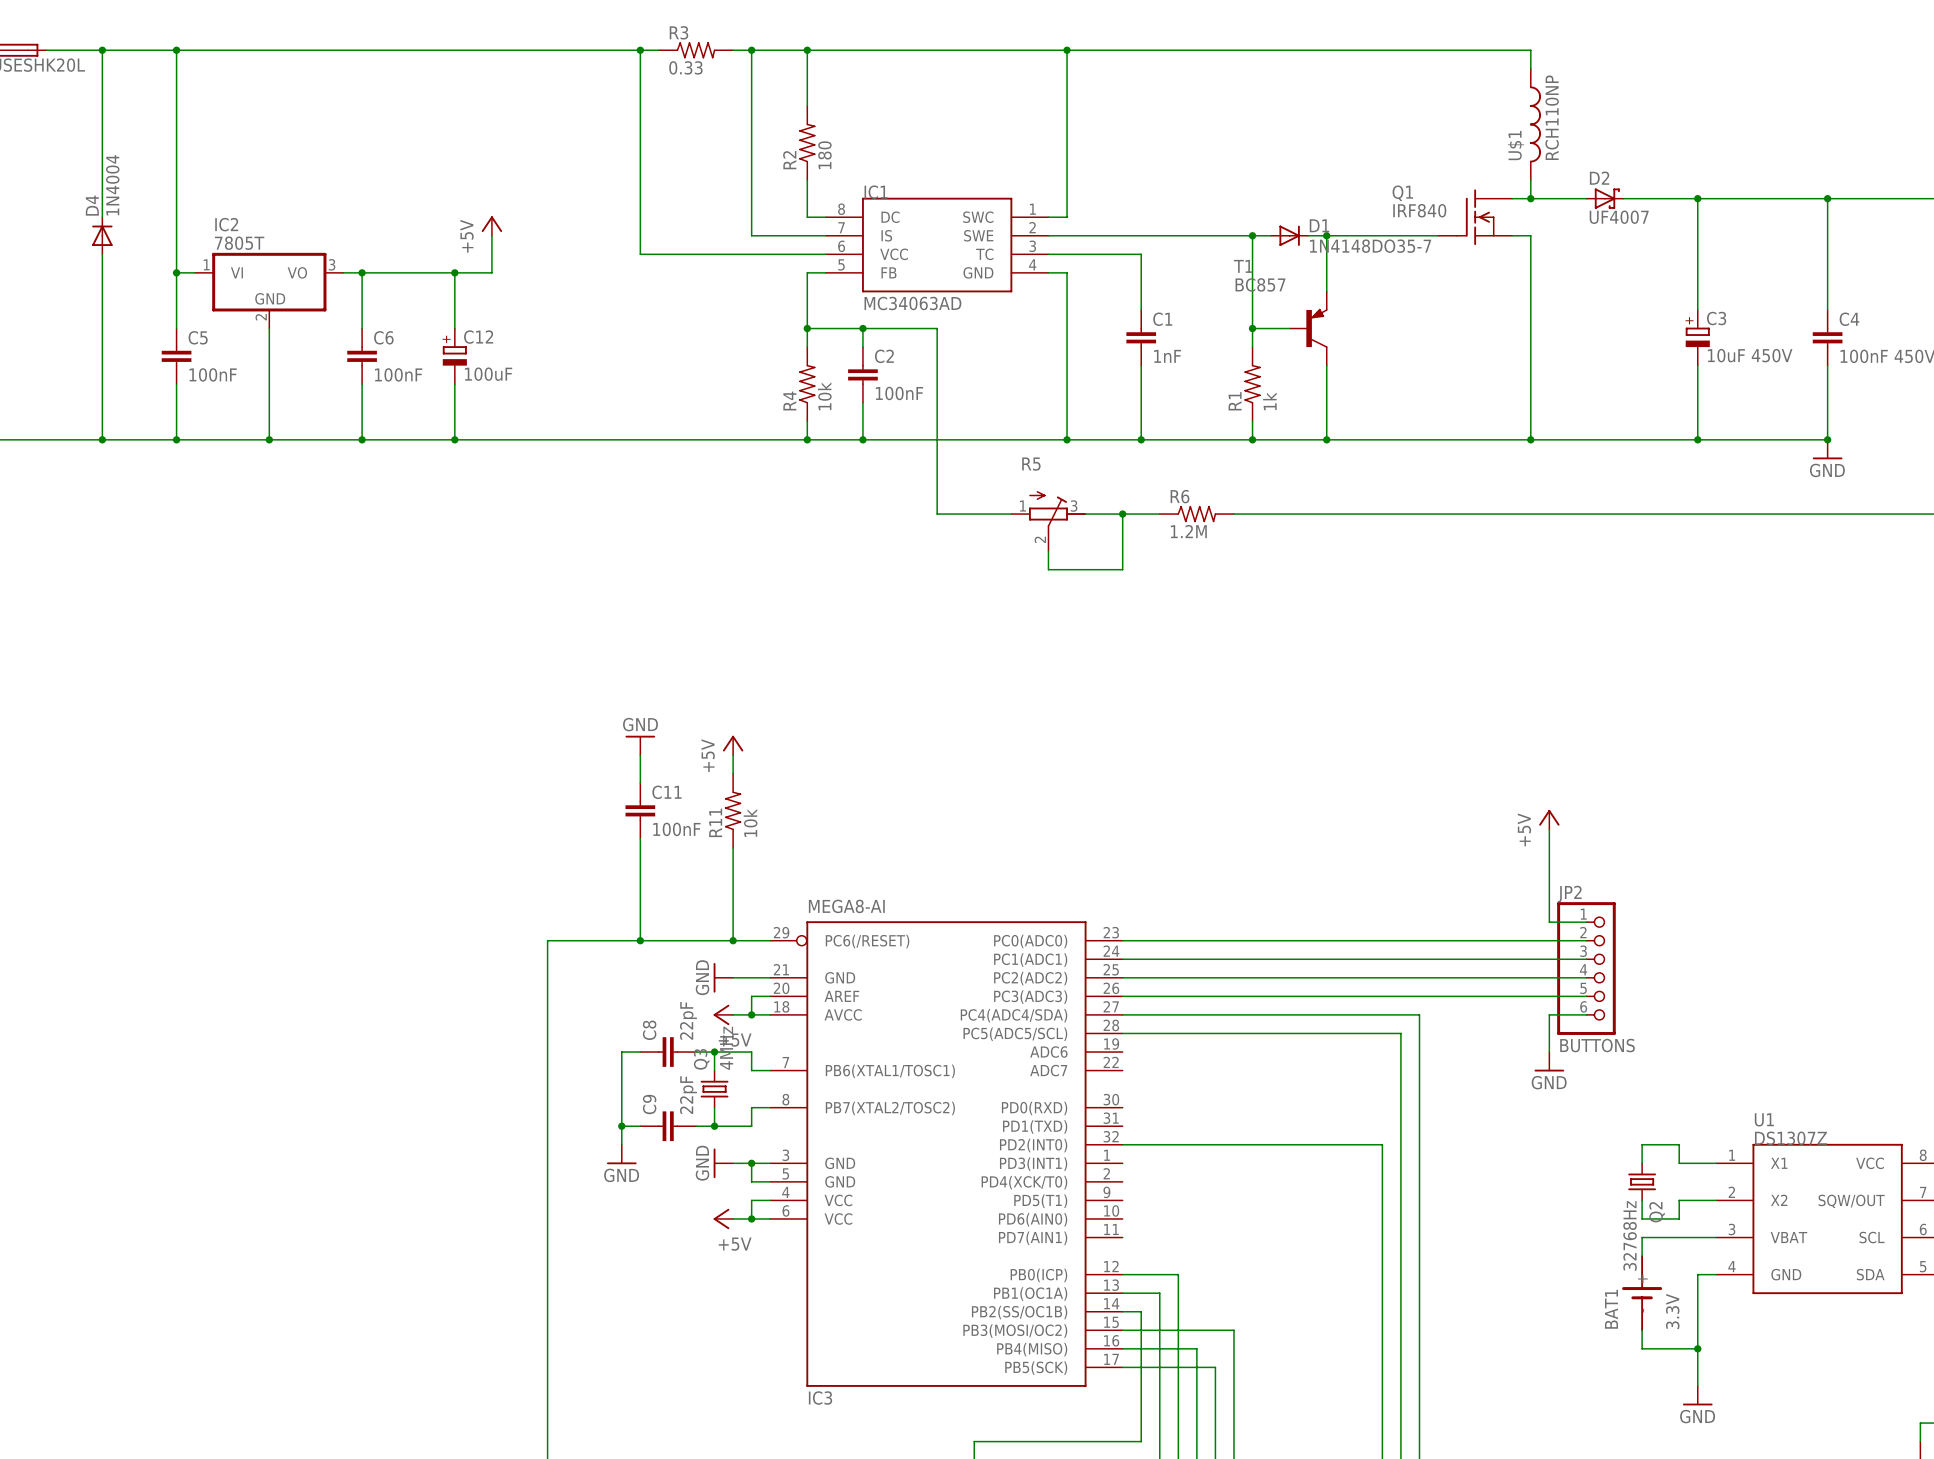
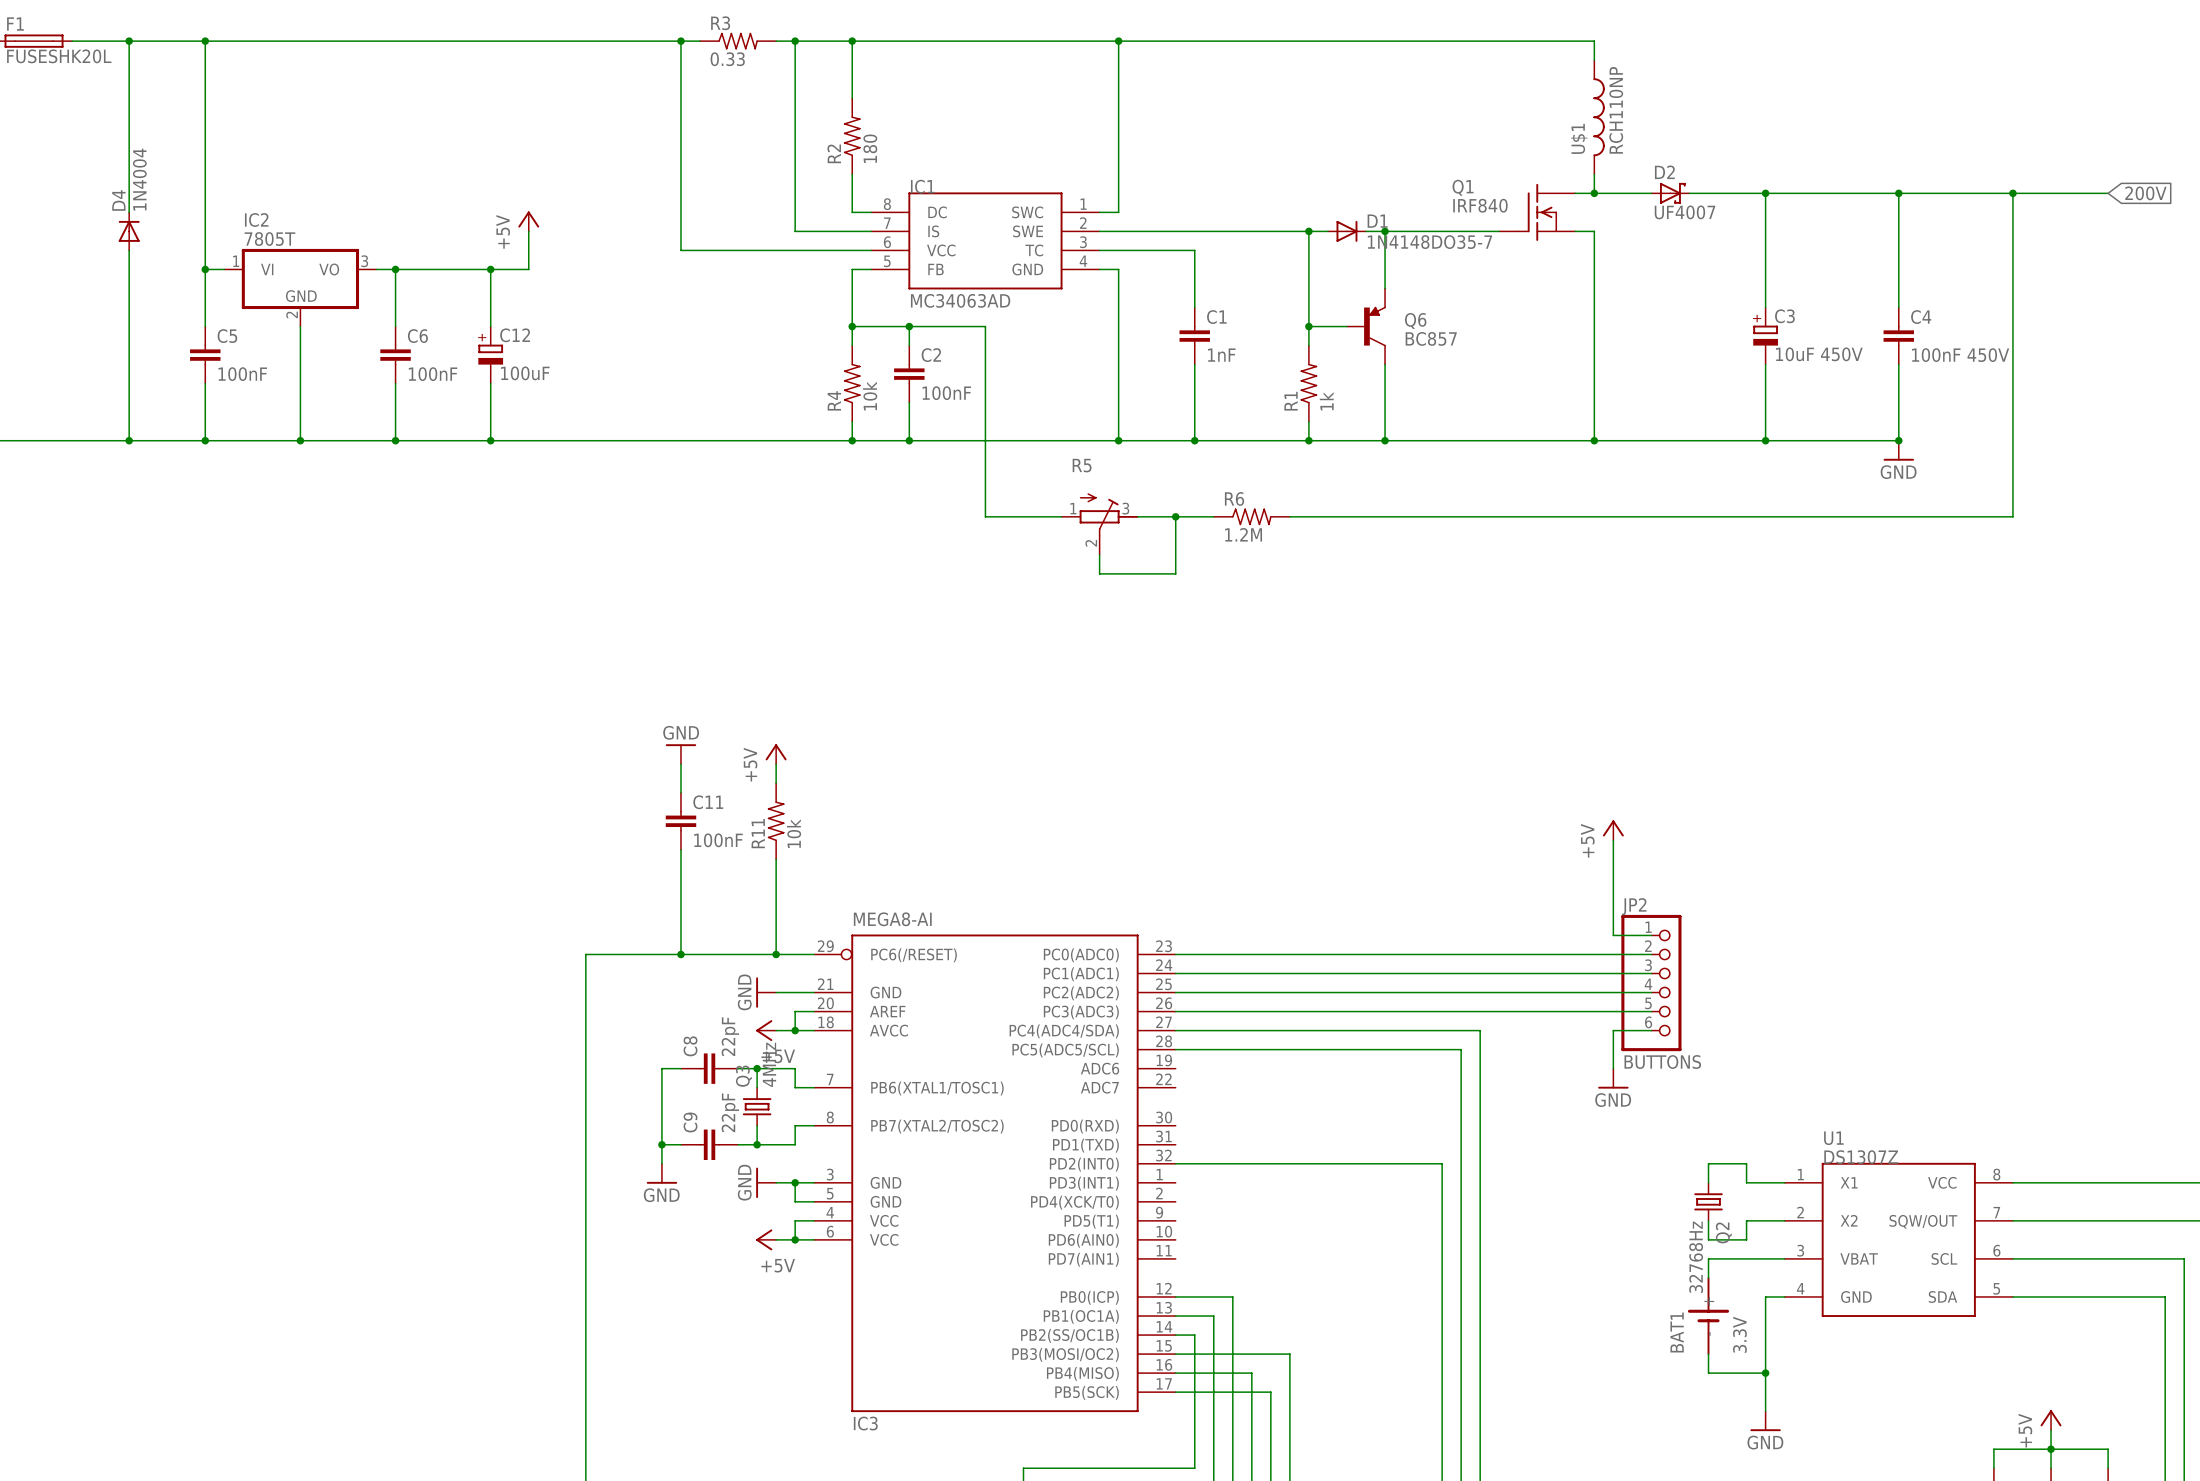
T1: BC857 (1308, 328) -> none
Q6: none -> BC857 (1366, 326)

